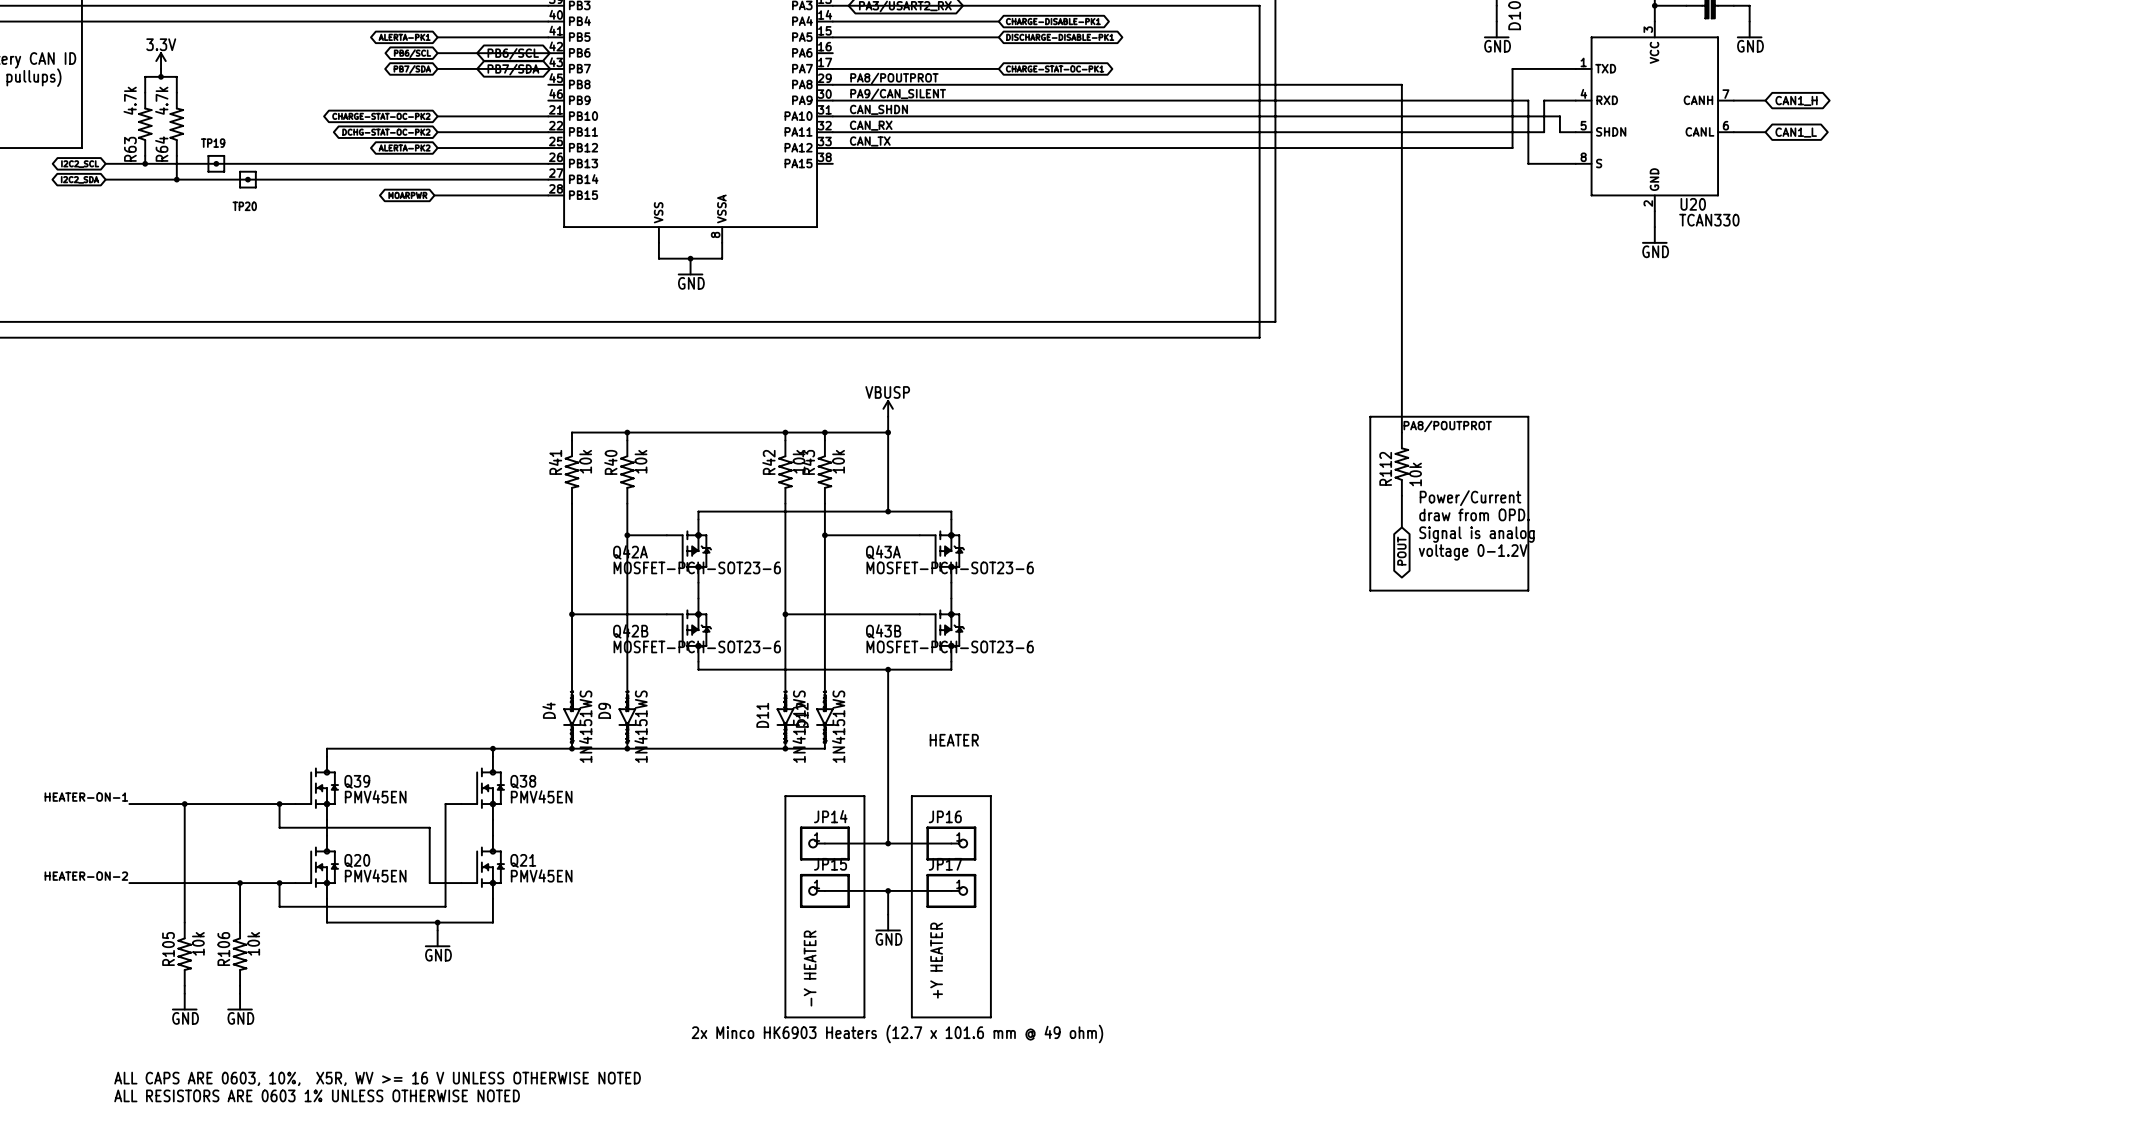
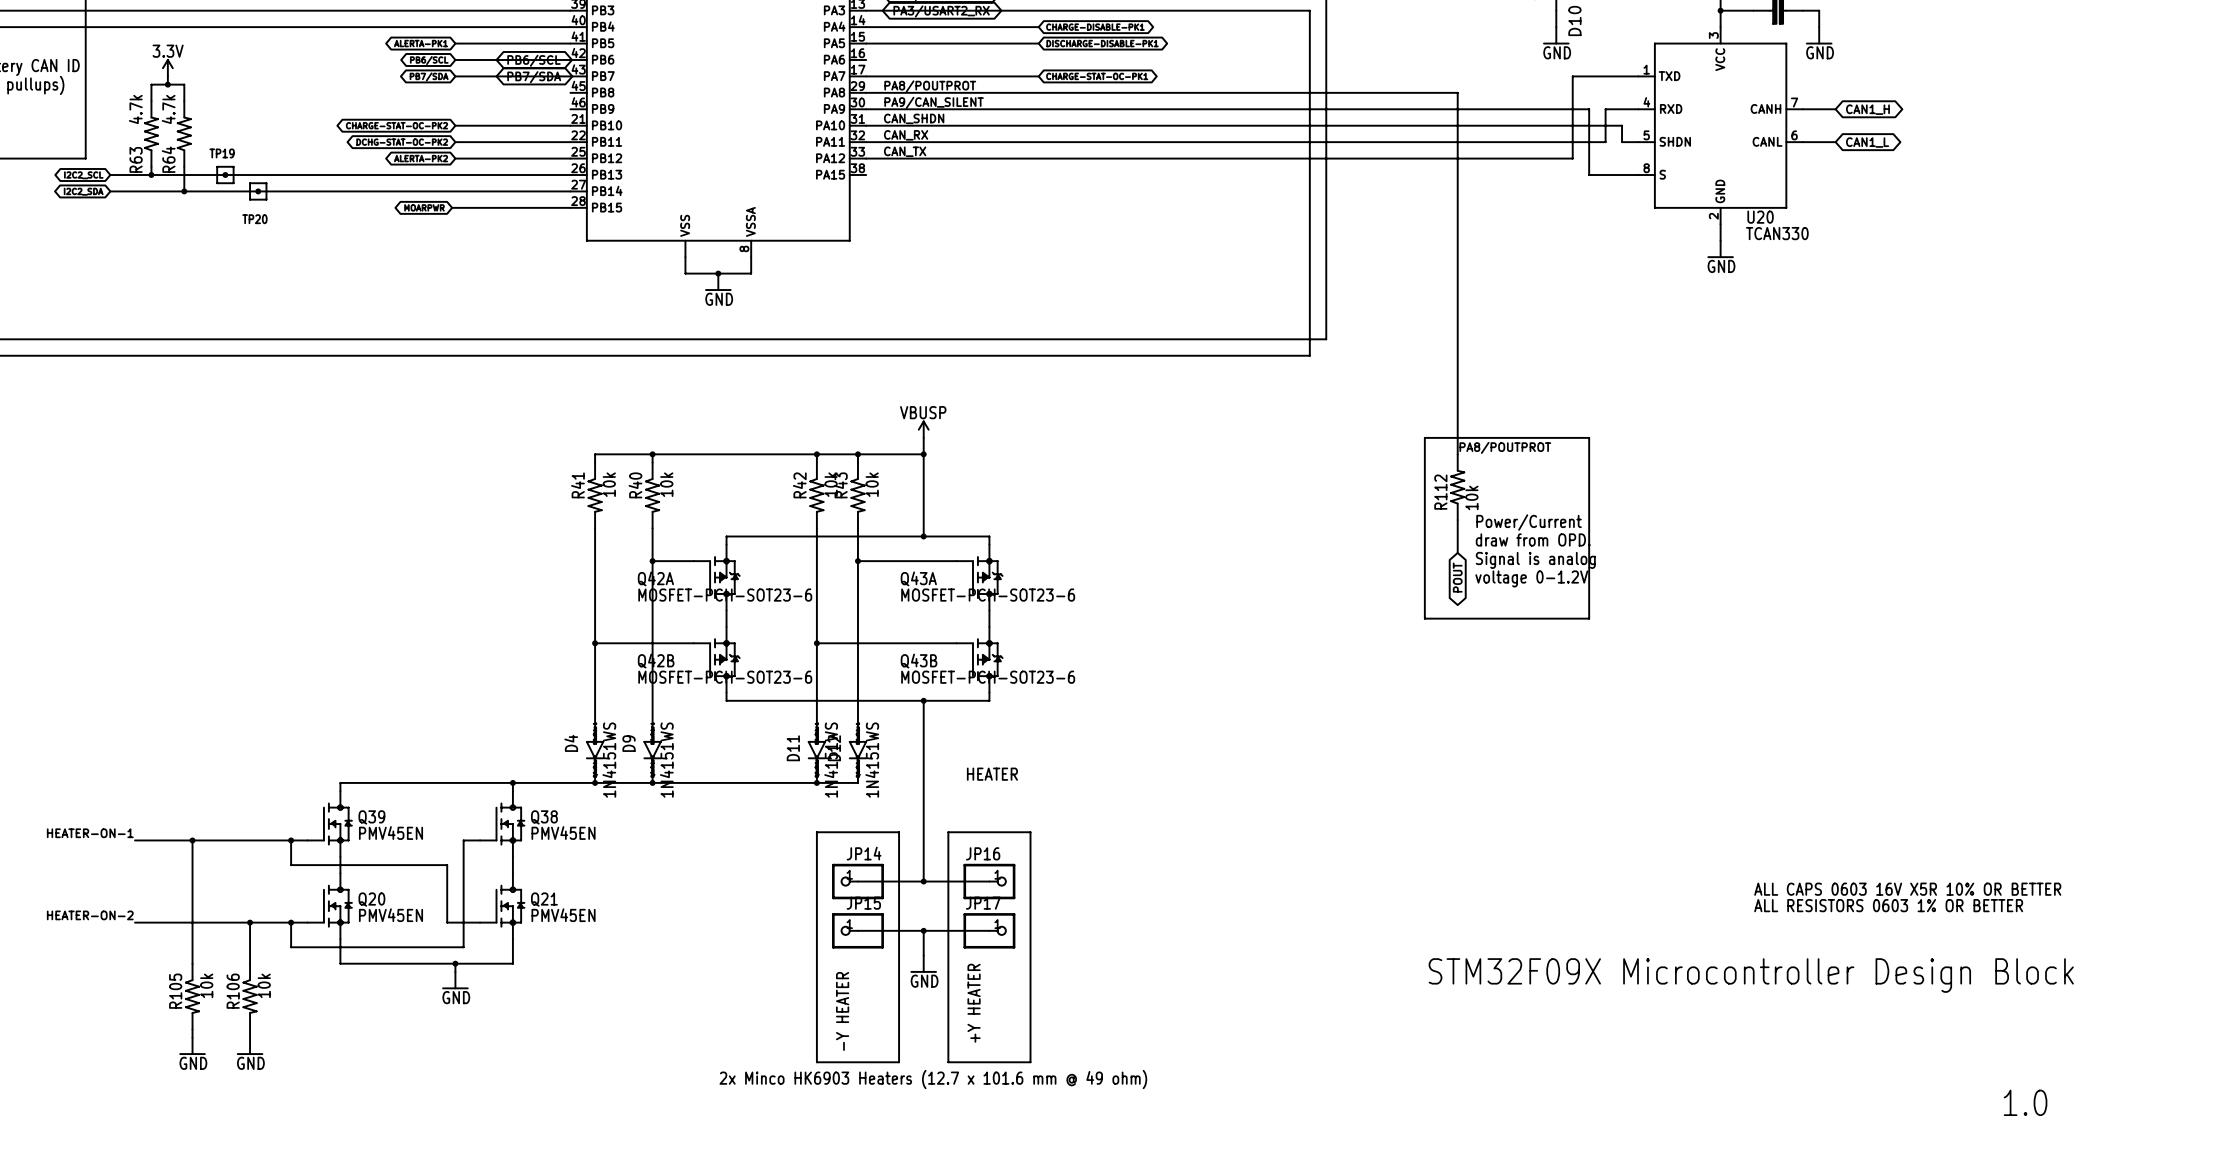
text: none -> ALL CAPS 0603 16V X5R 10% OR BETTER (1907, 889)
text: none -> ALL RESISTORS 0603 1% OR BETTER (1888, 905)
text: none -> STM32F09X Microcontroller Design Block (1751, 975)
text: none -> 1.0 (2025, 1102)
text: ALL CAPS ARE 0603, 10%, X5R, WV >= 16 V UNLESS OTHERWISE NOTED (377, 1078) -> none
text: ALL RESISTORS ARE 0603 1% UNLESS OTHERWISE NOTED (317, 1095) -> none

